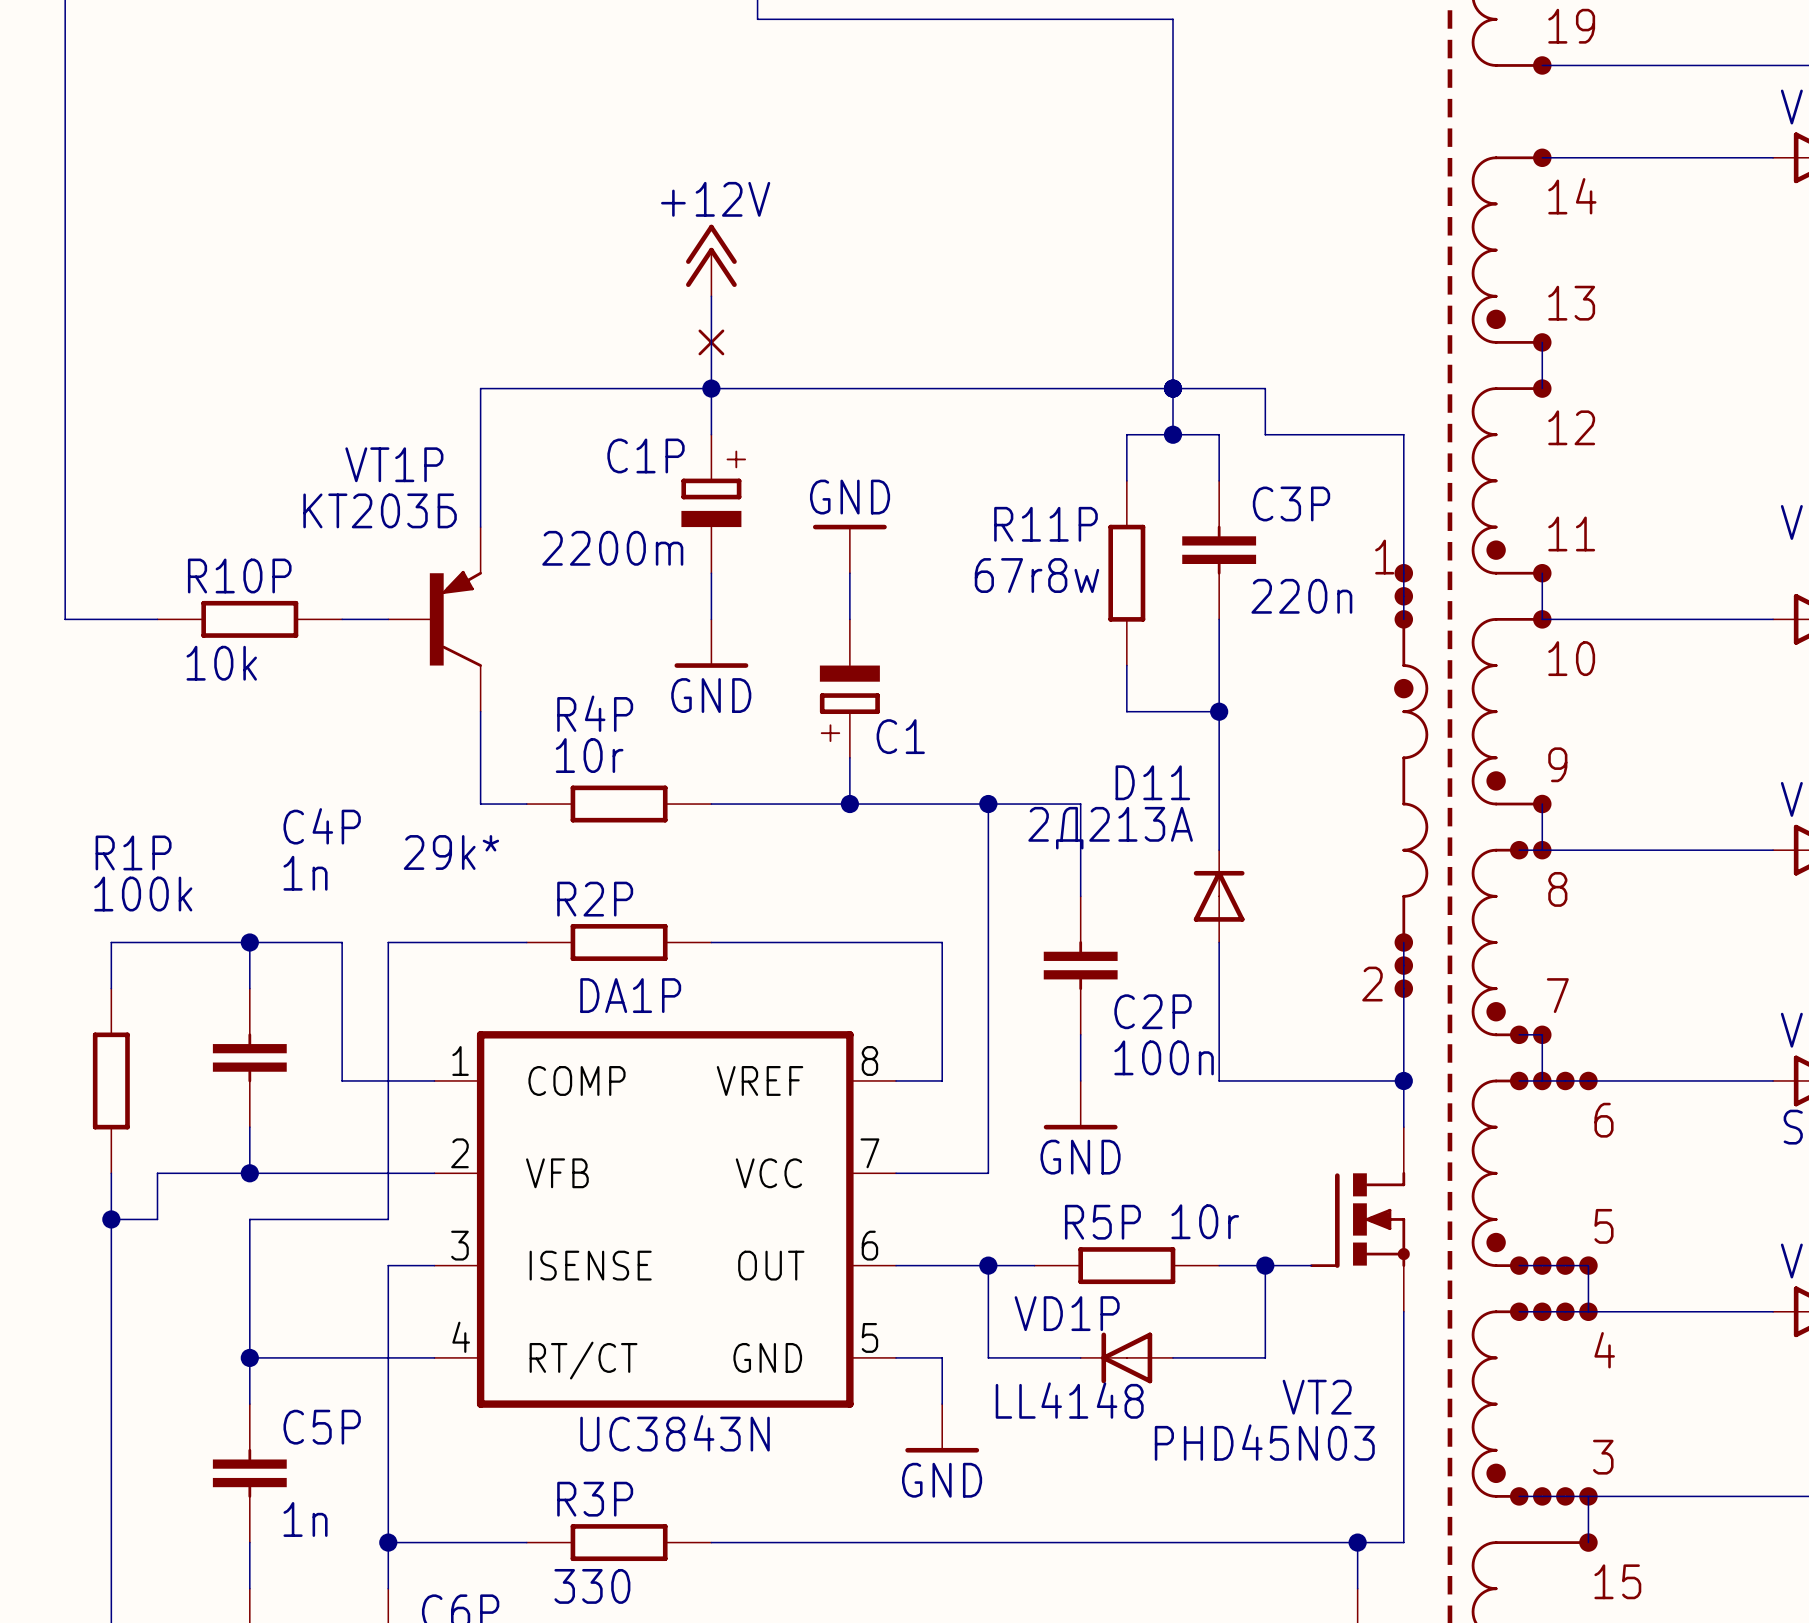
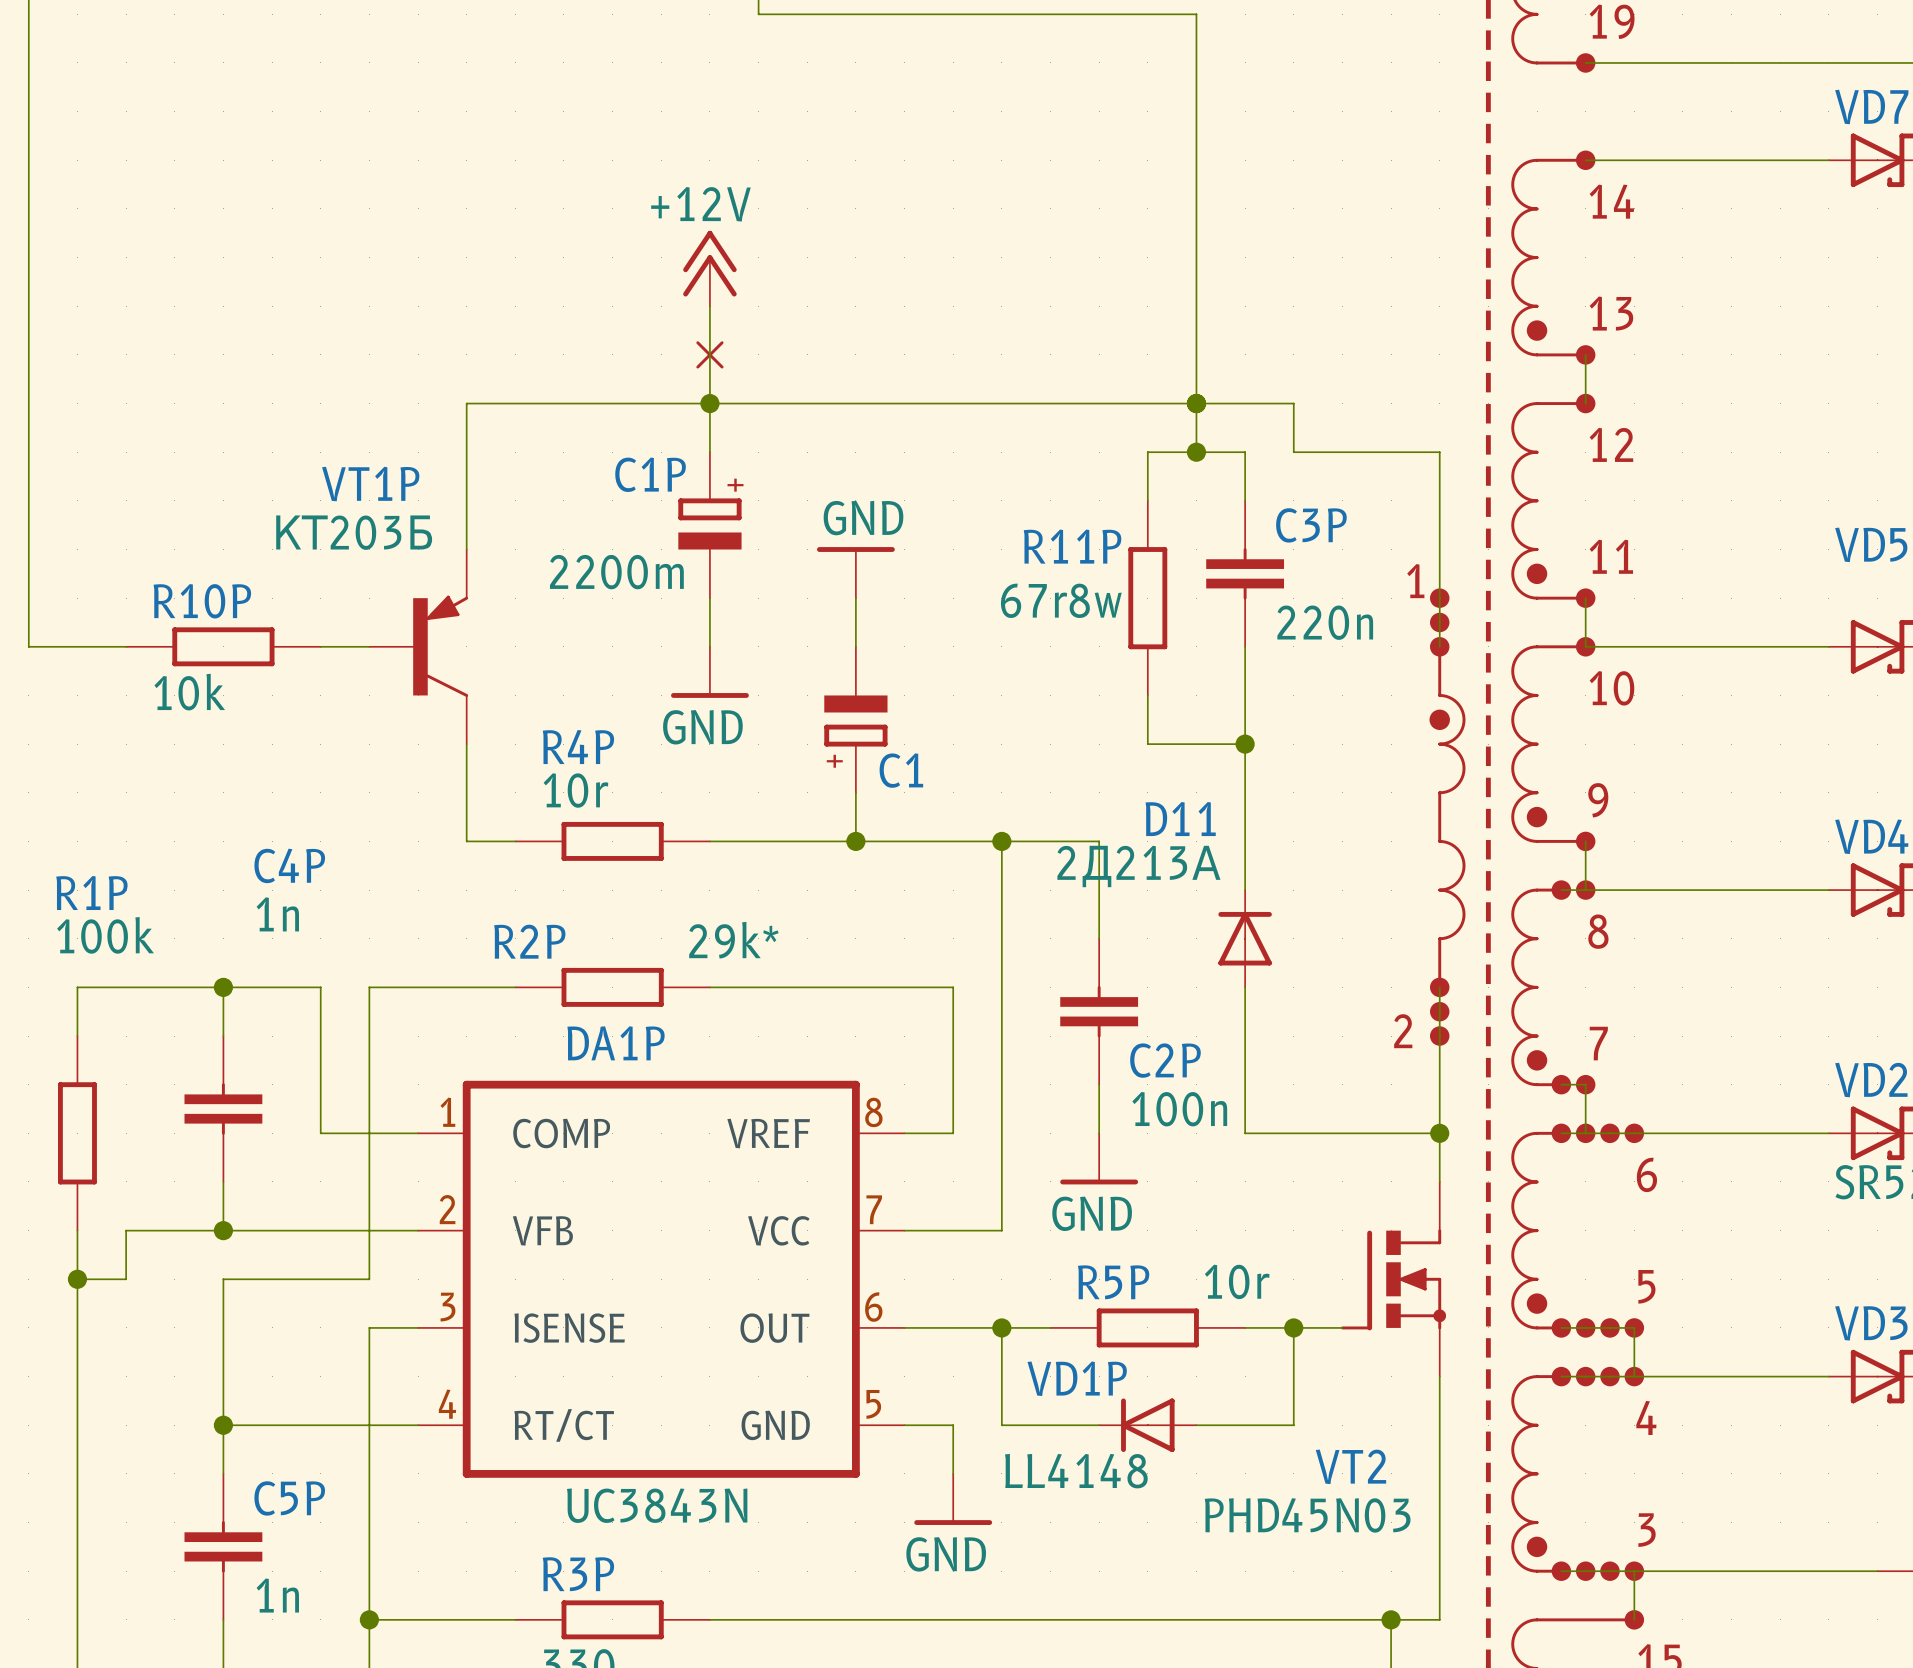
R2P value position: 29k* (451, 852) -> 29k* (733, 940)
R2P name position: R2P (595, 899) -> R2P (529, 941)

